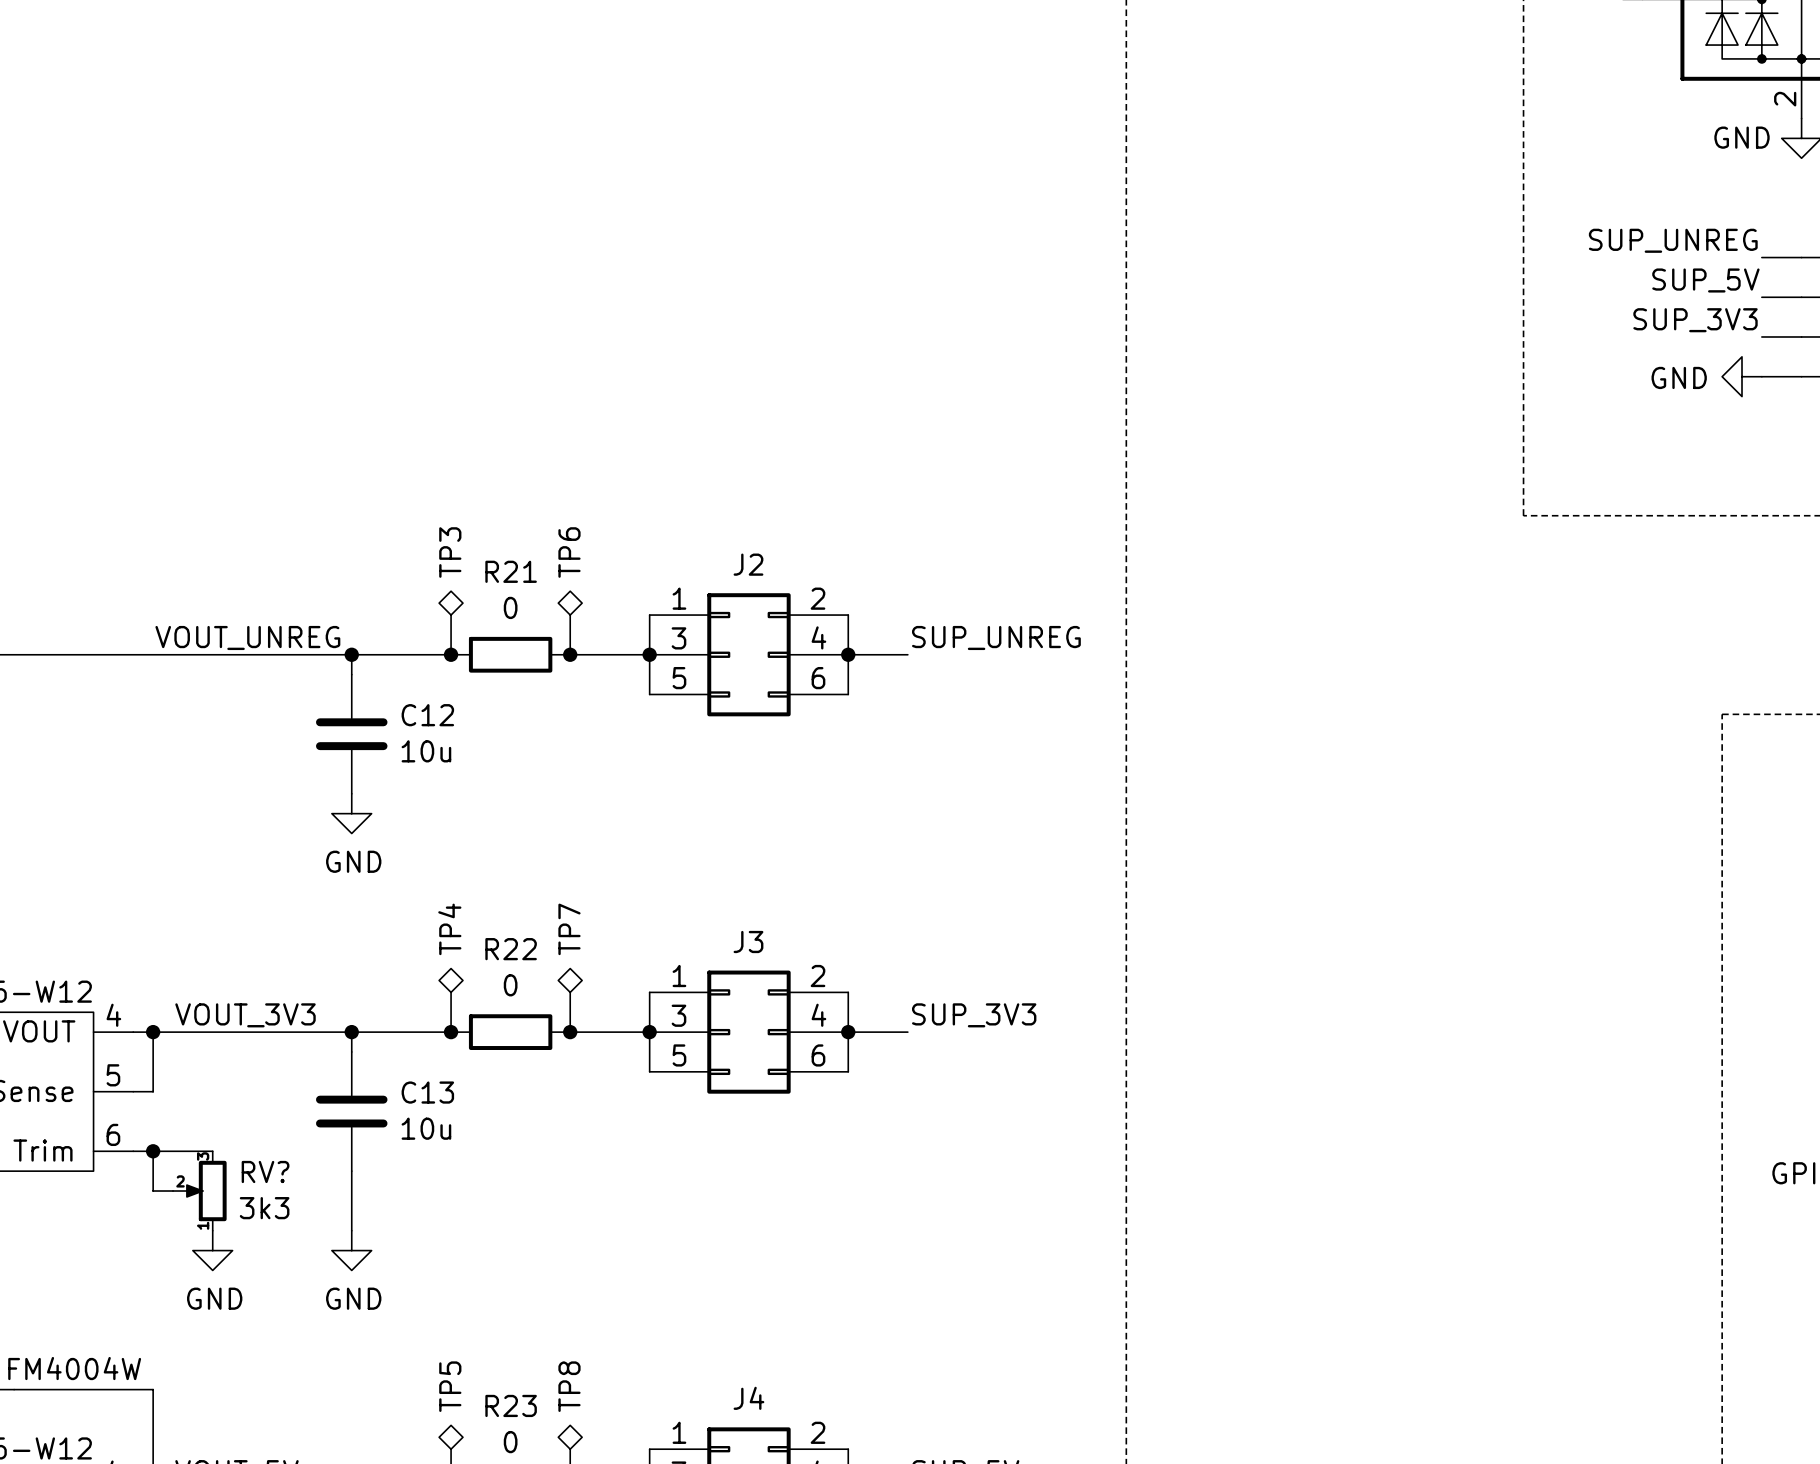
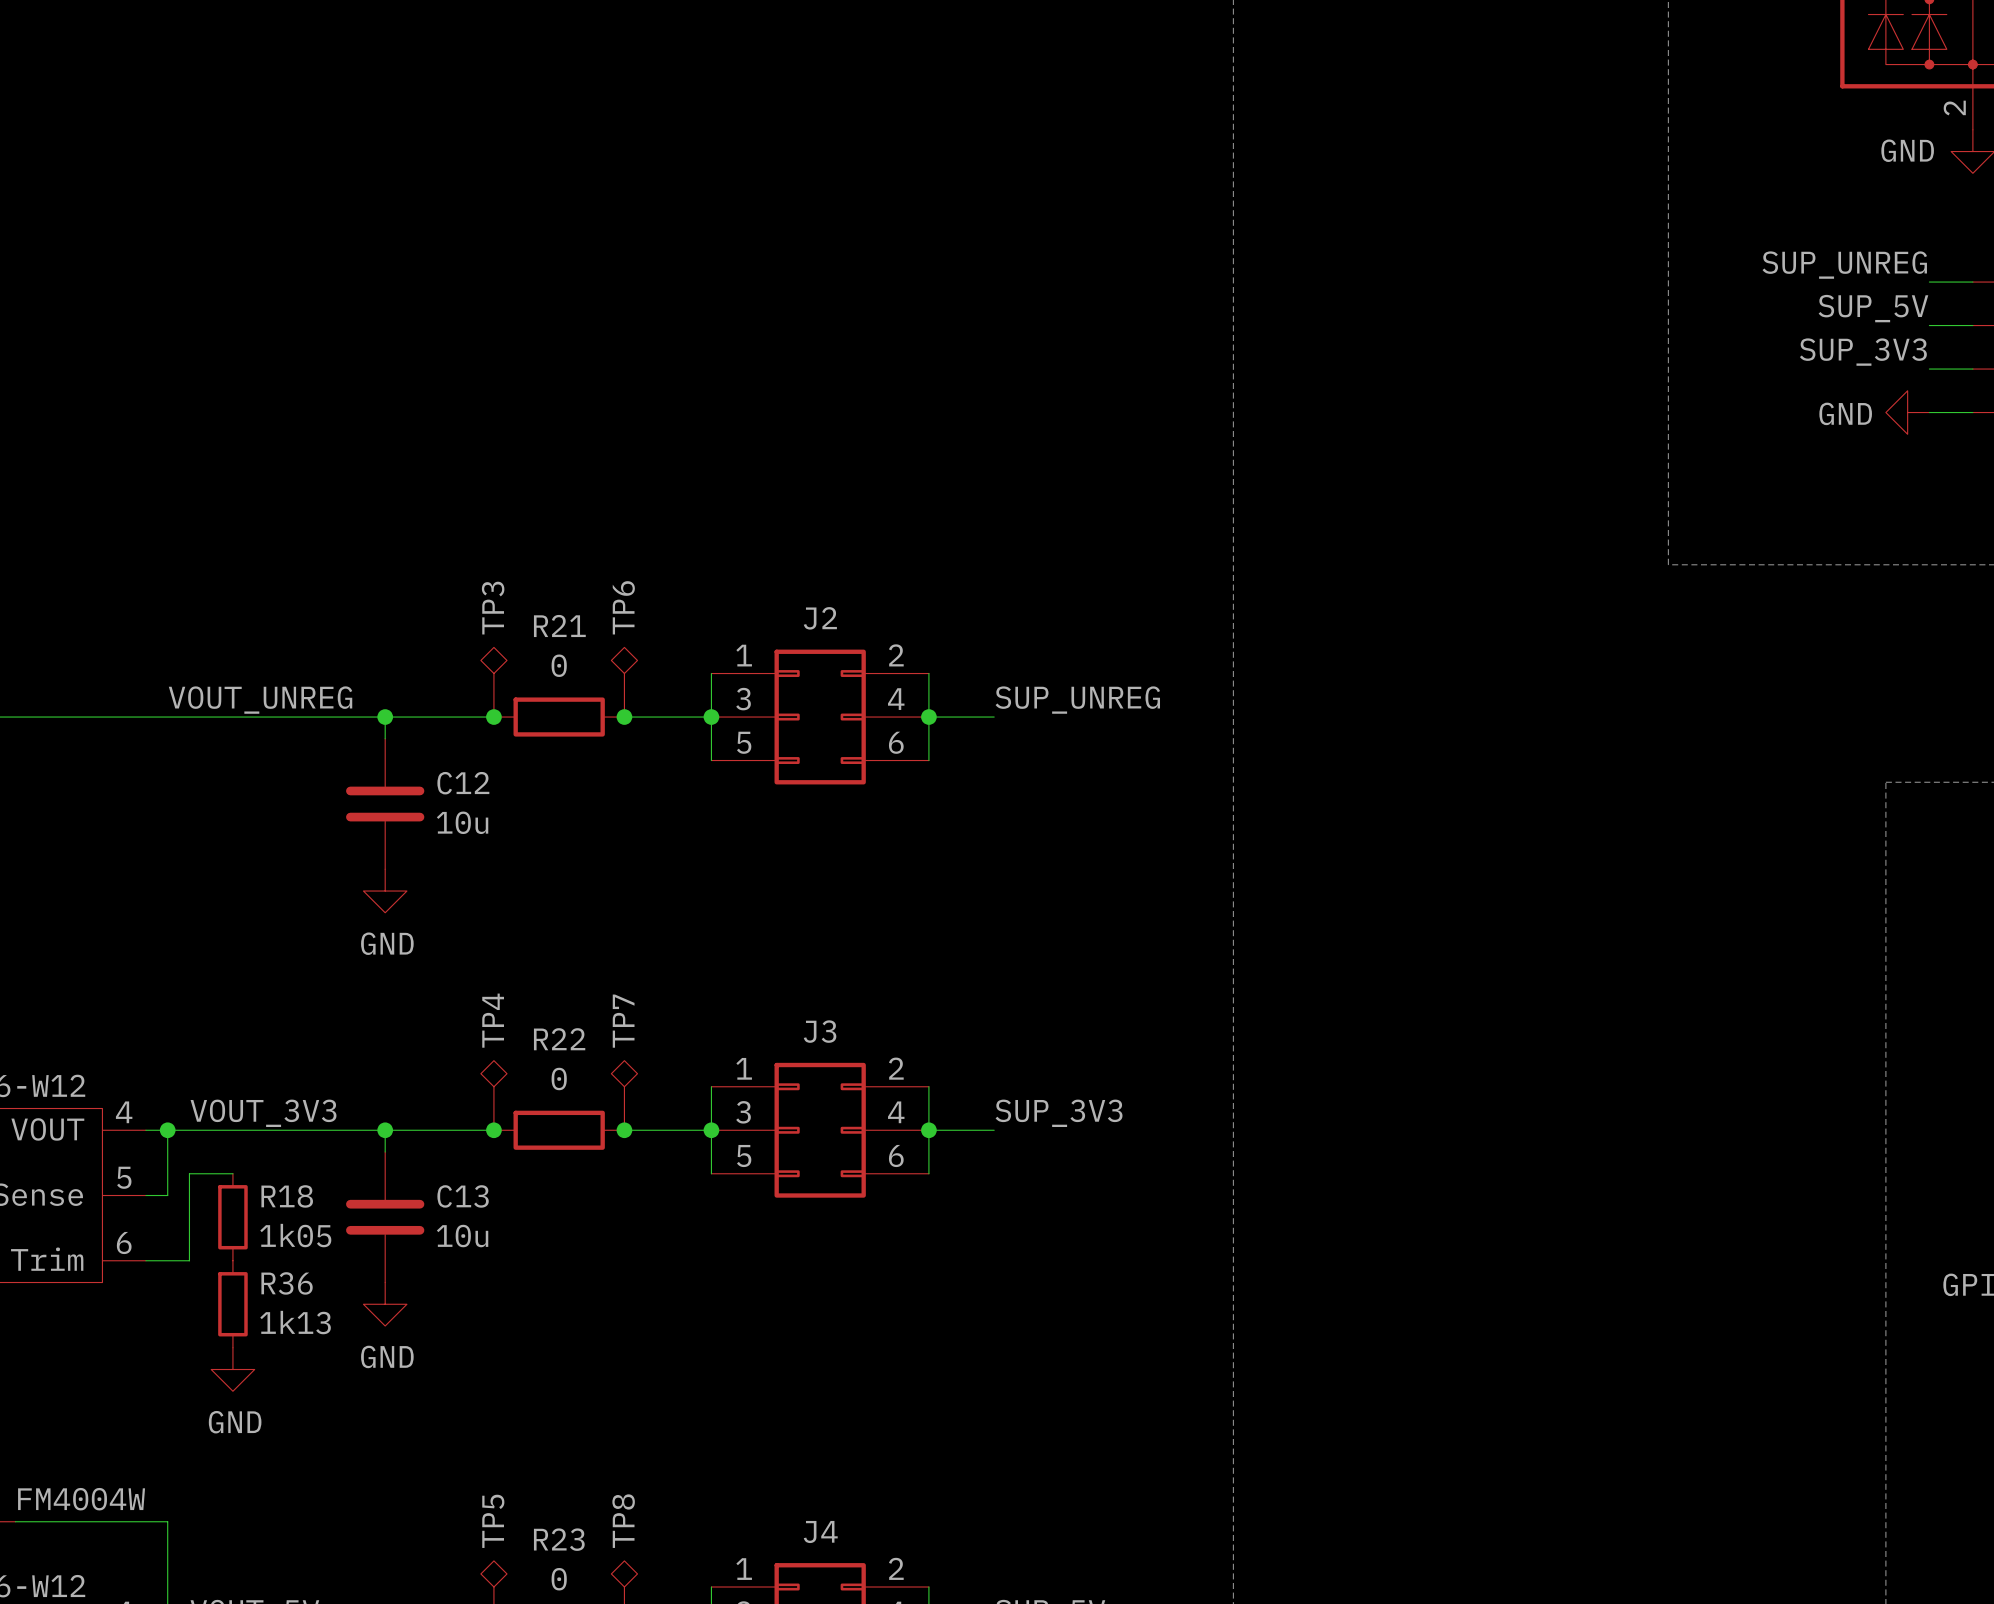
R18: none -> 1k05 (232, 1217)
wire: (153, 1151) (153, 1191) (173, 1191) -> none
junction: (153, 1151) -> none
wire: (173, 1151) (212, 1151) -> (189, 1260) (189, 1173) (232, 1173)
wire: (351, 1171) (351, 1230) -> none
RV?: 3k3 (199, 1191) -> none
R36: none -> 1k13 (232, 1304)
power symbol position: GND (351, 1250) -> GND (385, 1304)

